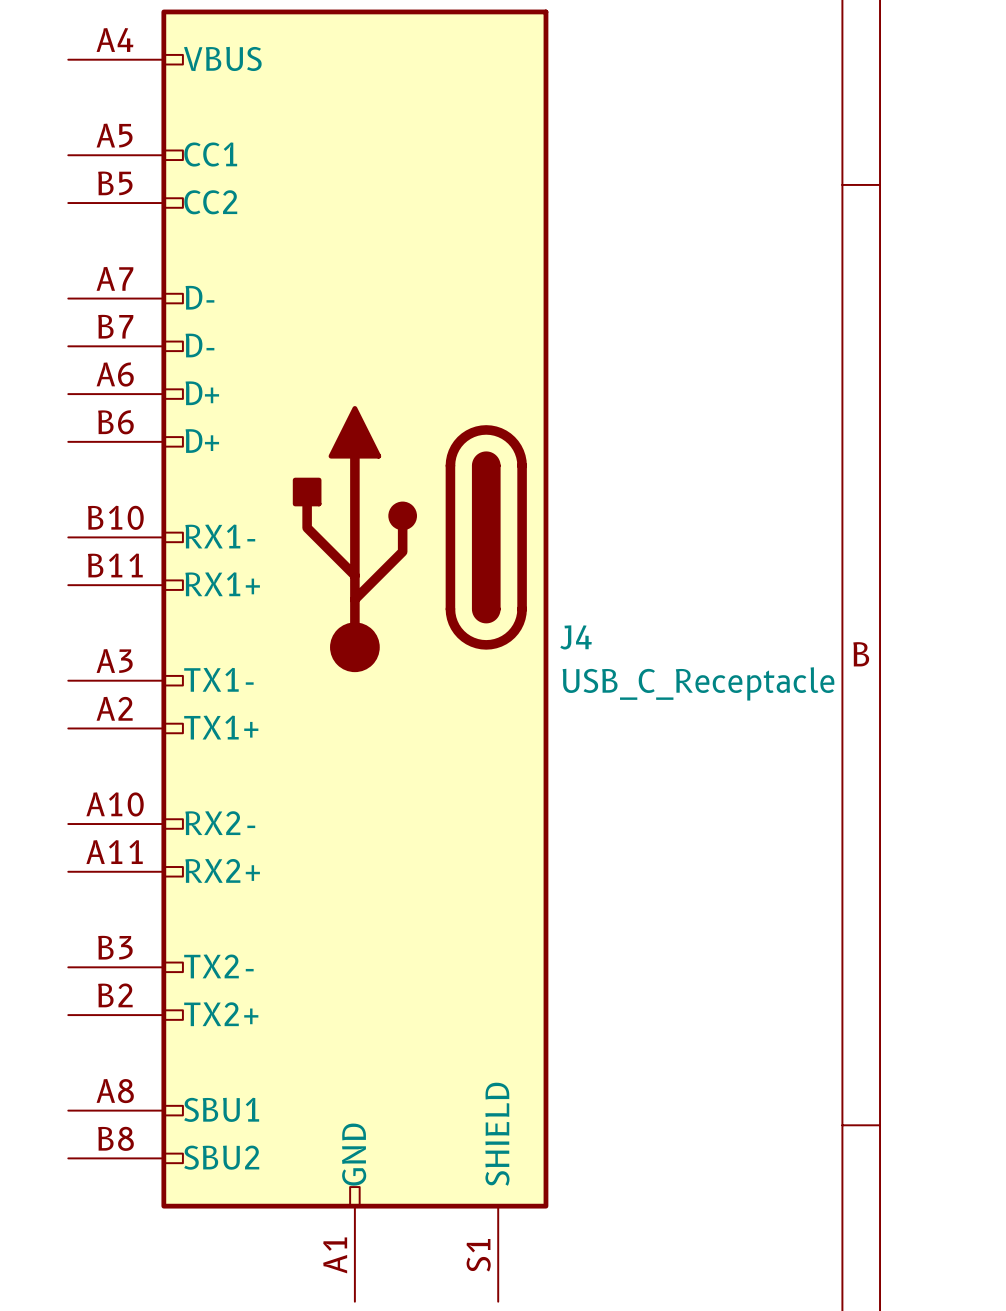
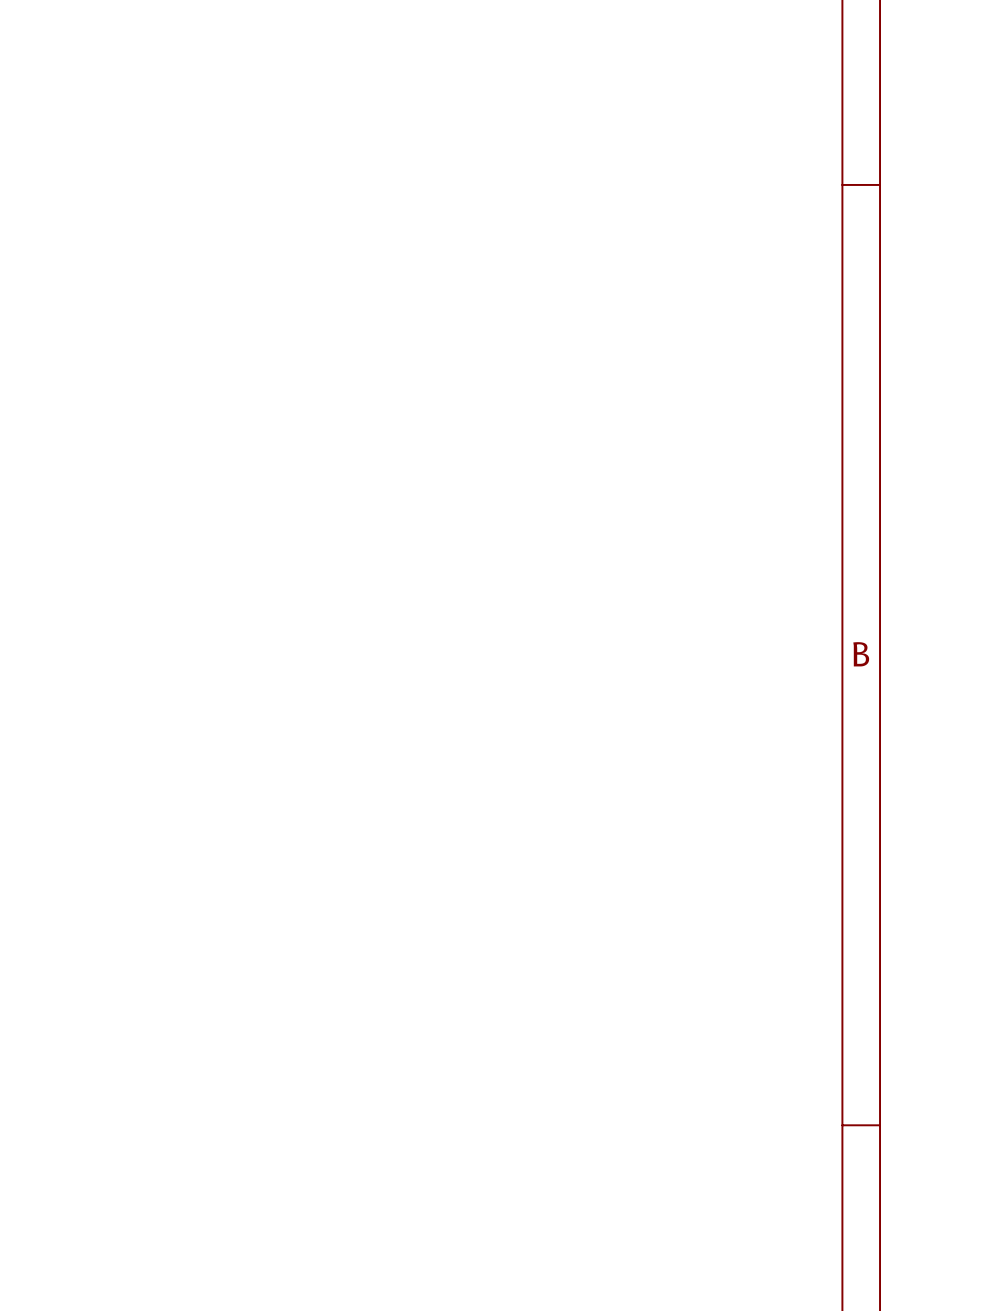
J4: USB_C_Receptacle (308, 655) -> none

